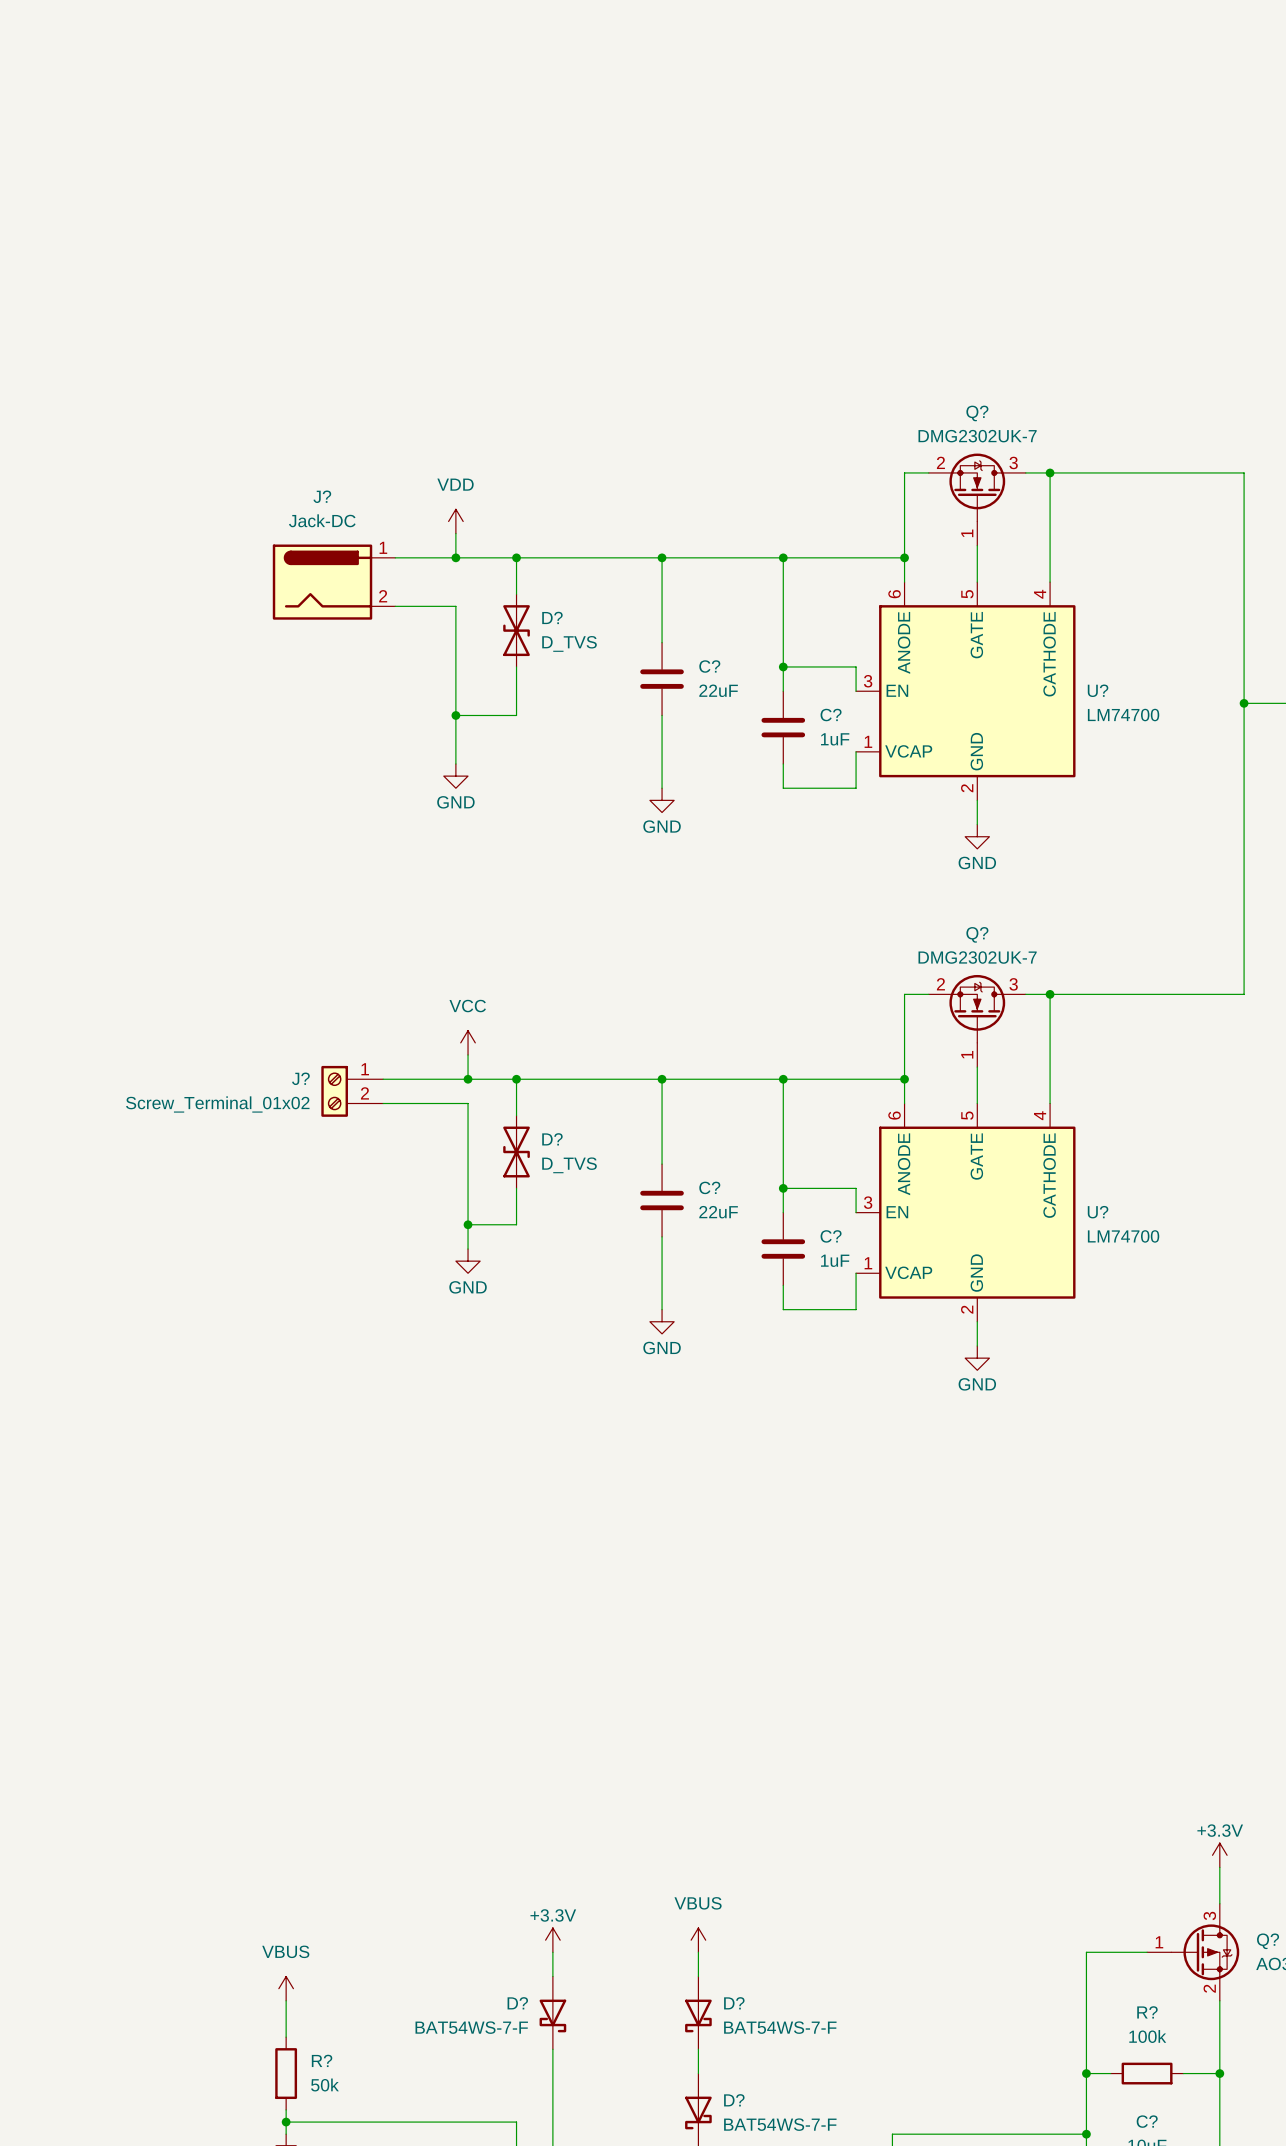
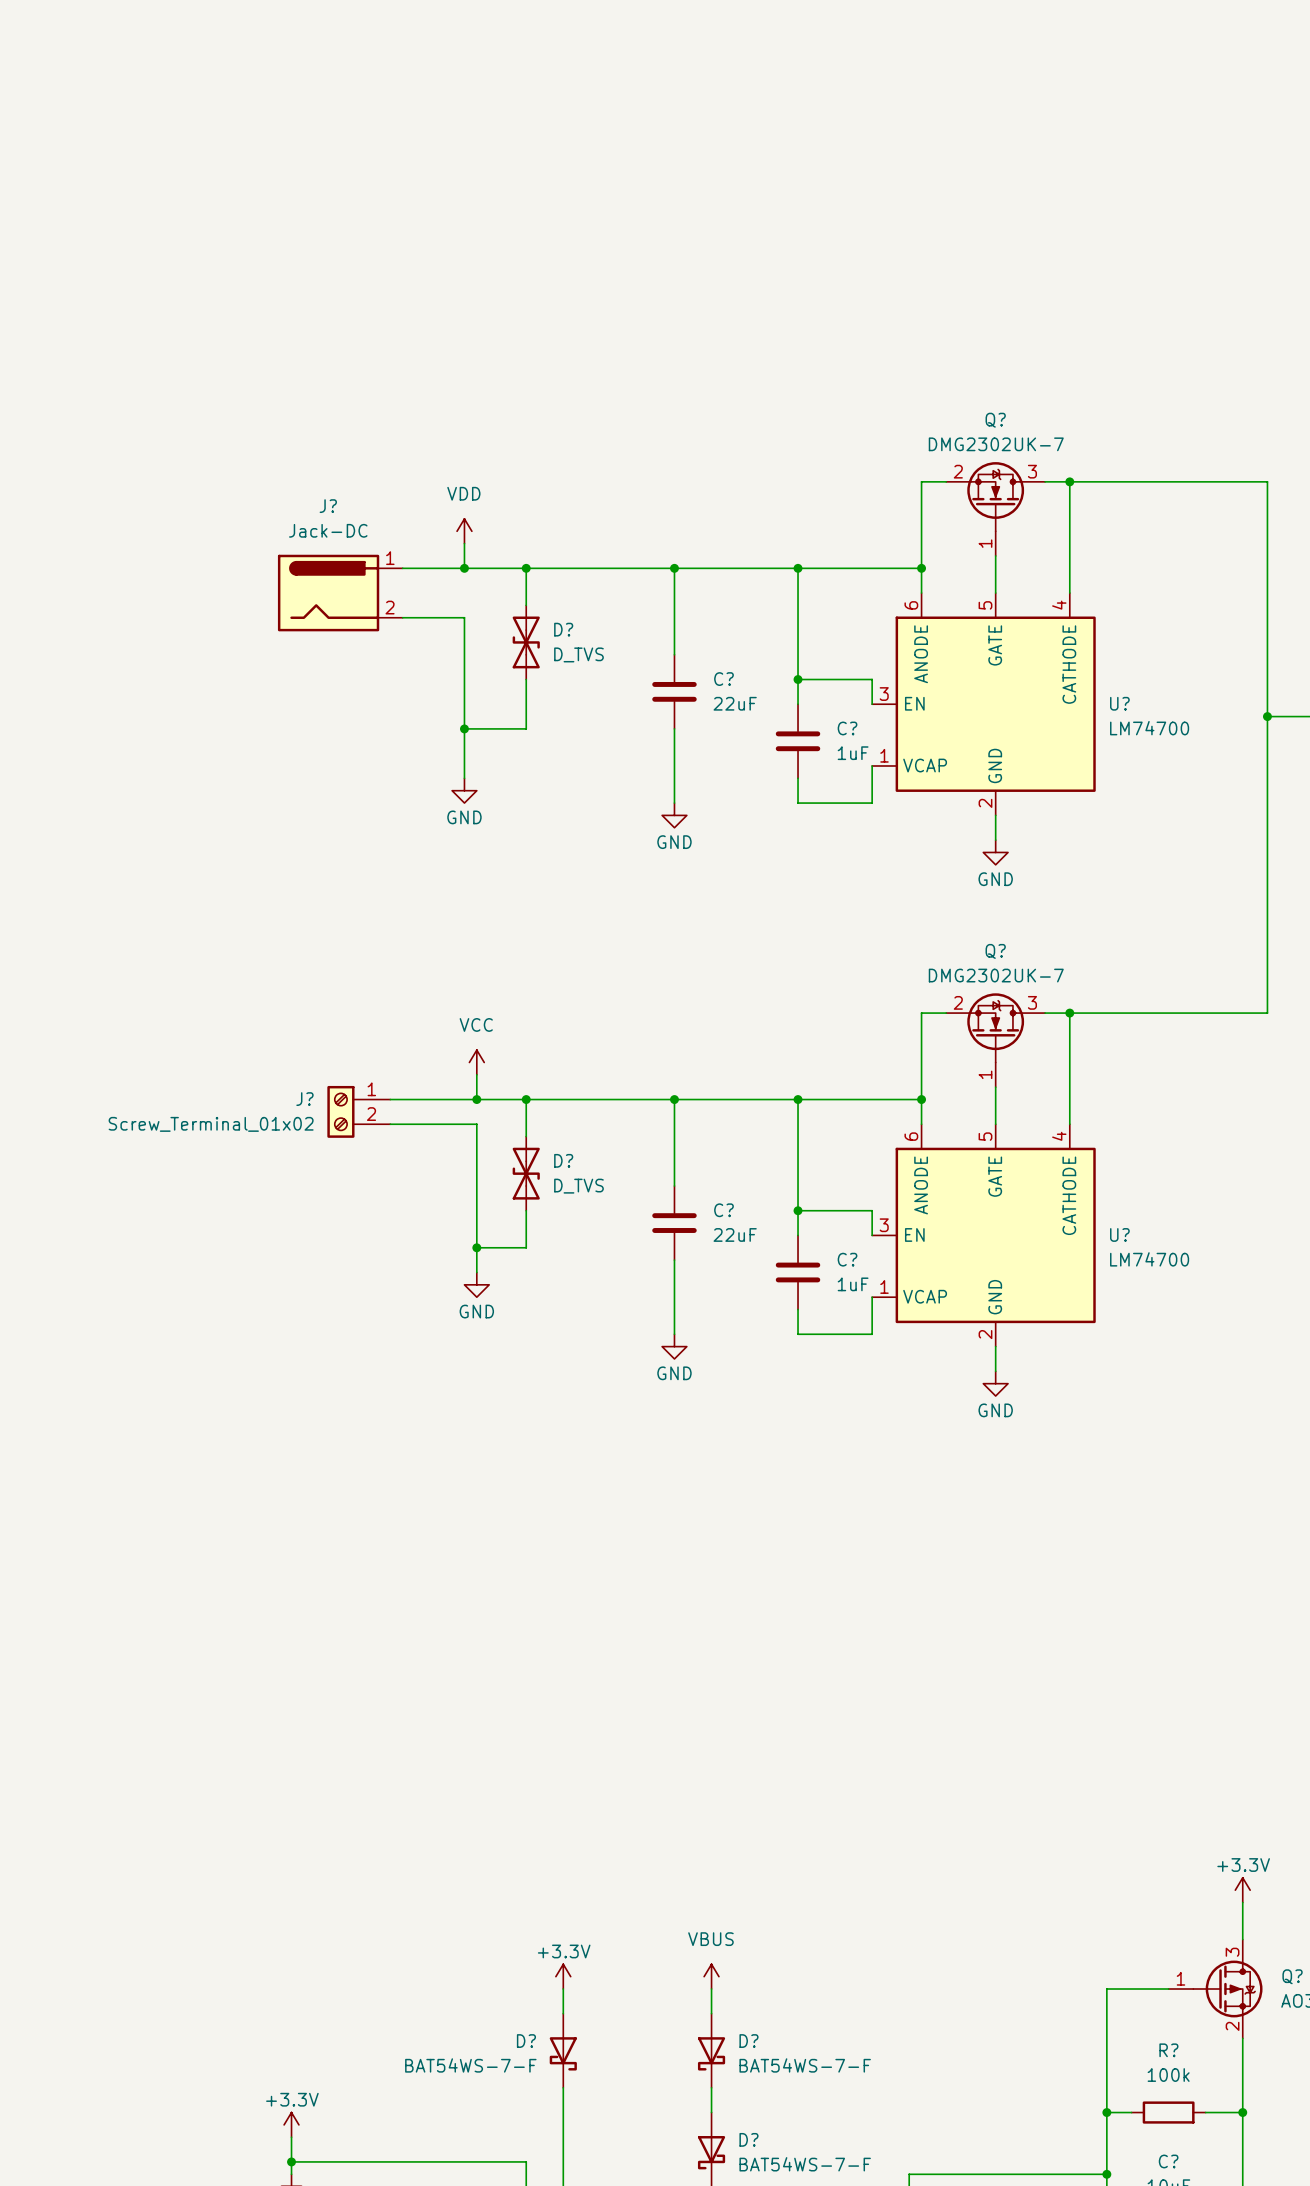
power symbol: VBUS (286, 1988) -> none
wire: (286, 2000) (286, 2037) -> none
R?: 50k (286, 2073) -> none
power symbol: none -> +3.3V (291, 2124)

